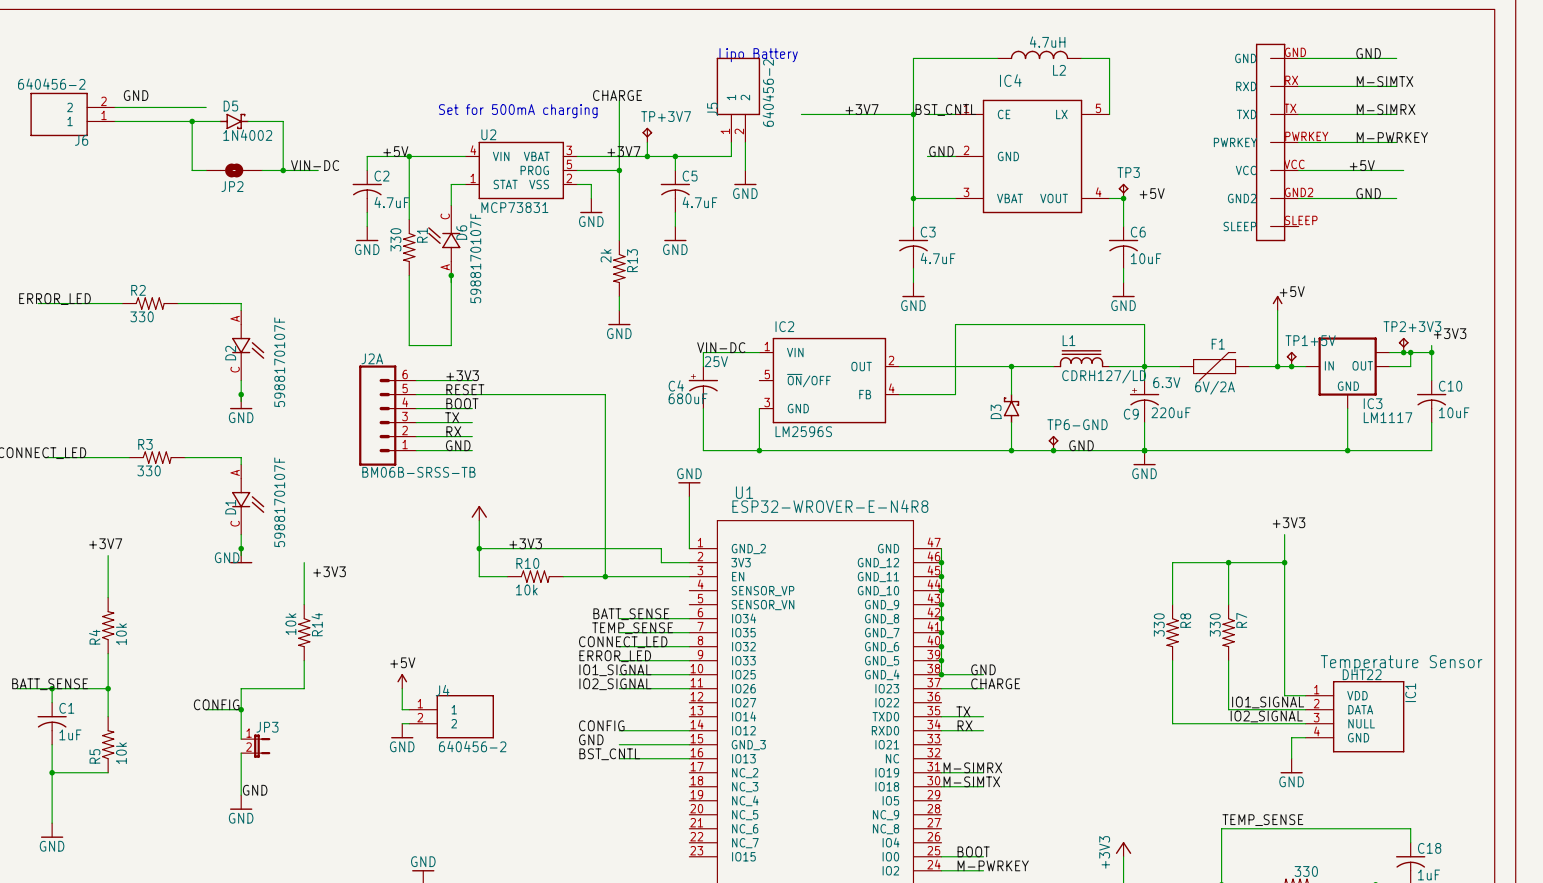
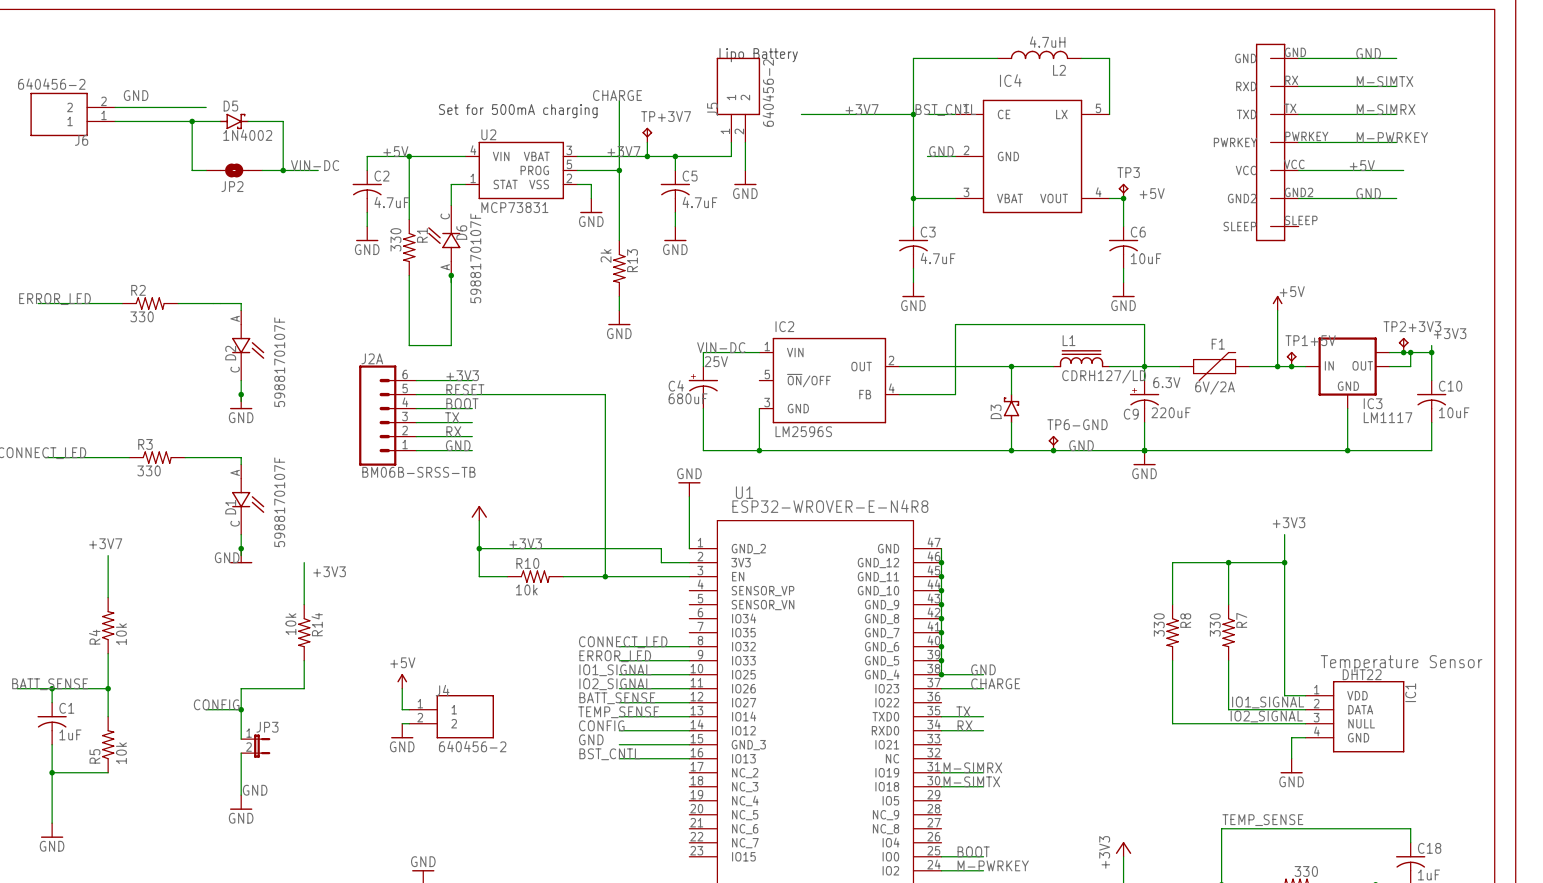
label position: BATT_SENSE (631, 614) -> BATT_SENSE (617, 698)
wire: (619, 618) (689, 618) -> (619, 716) (689, 716)
label position: TEMP_SENSE (632, 628) -> TEMP_SENSE (618, 712)
wire: (619, 632) (689, 632) -> (619, 702) (689, 702)

